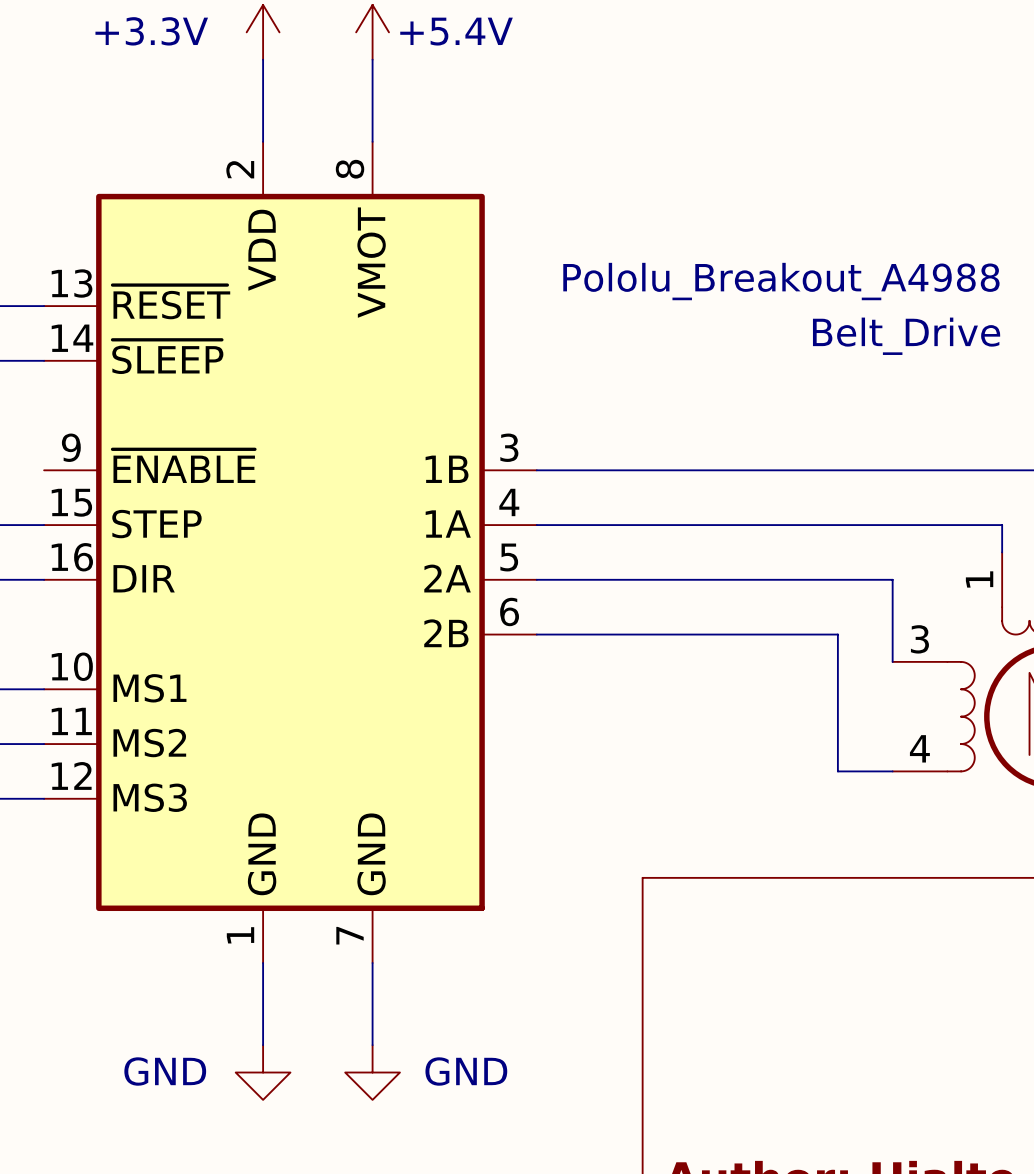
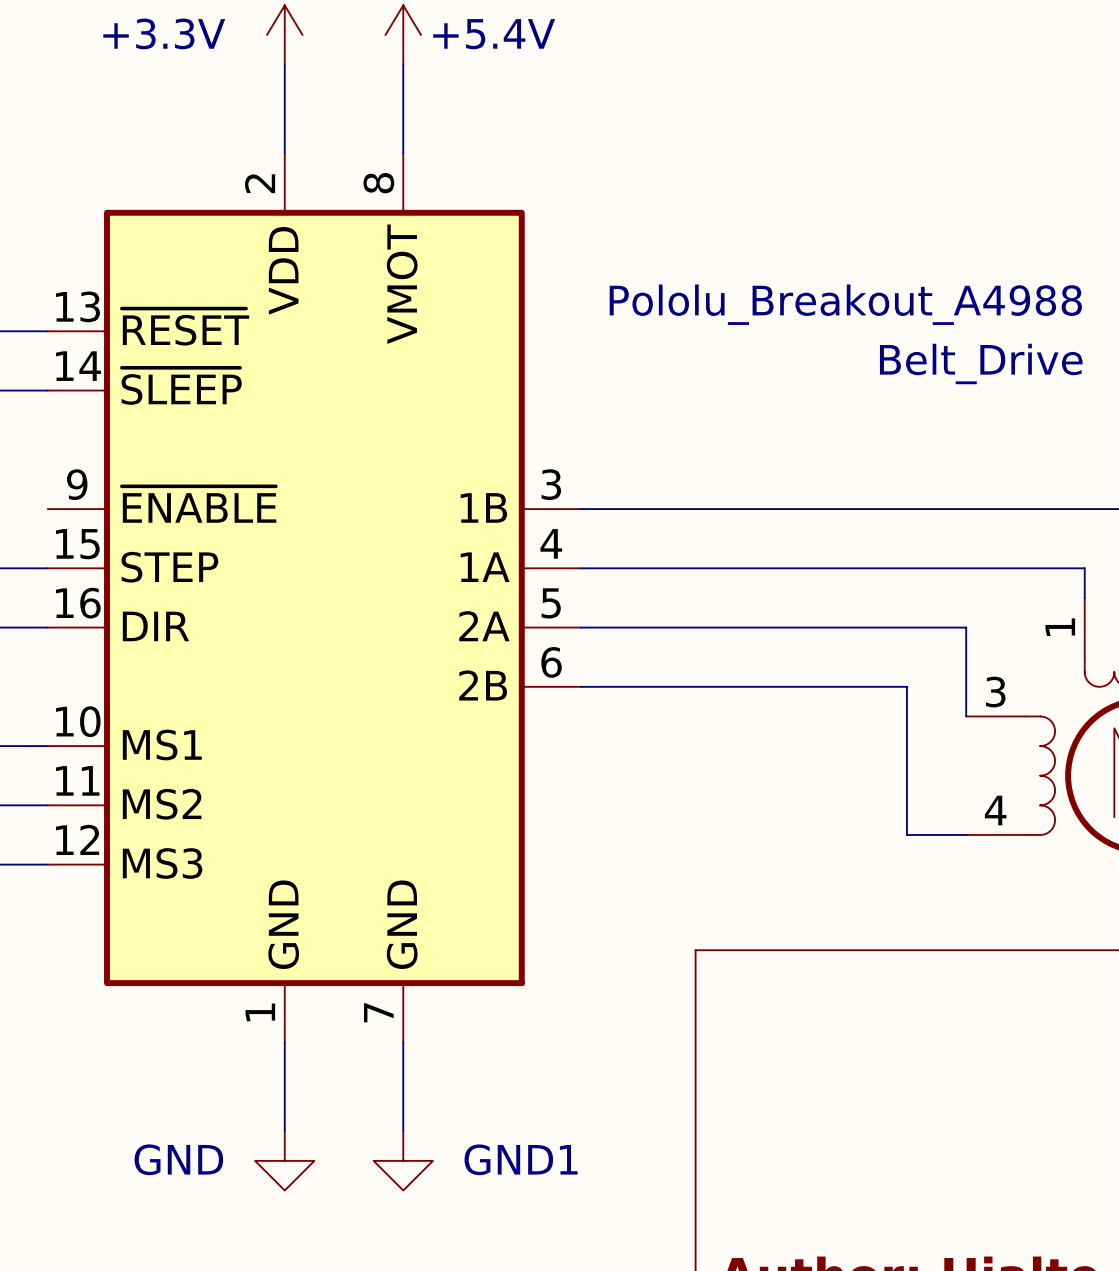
power symbol: GND (372, 1072) -> GND1 (403, 1160)

